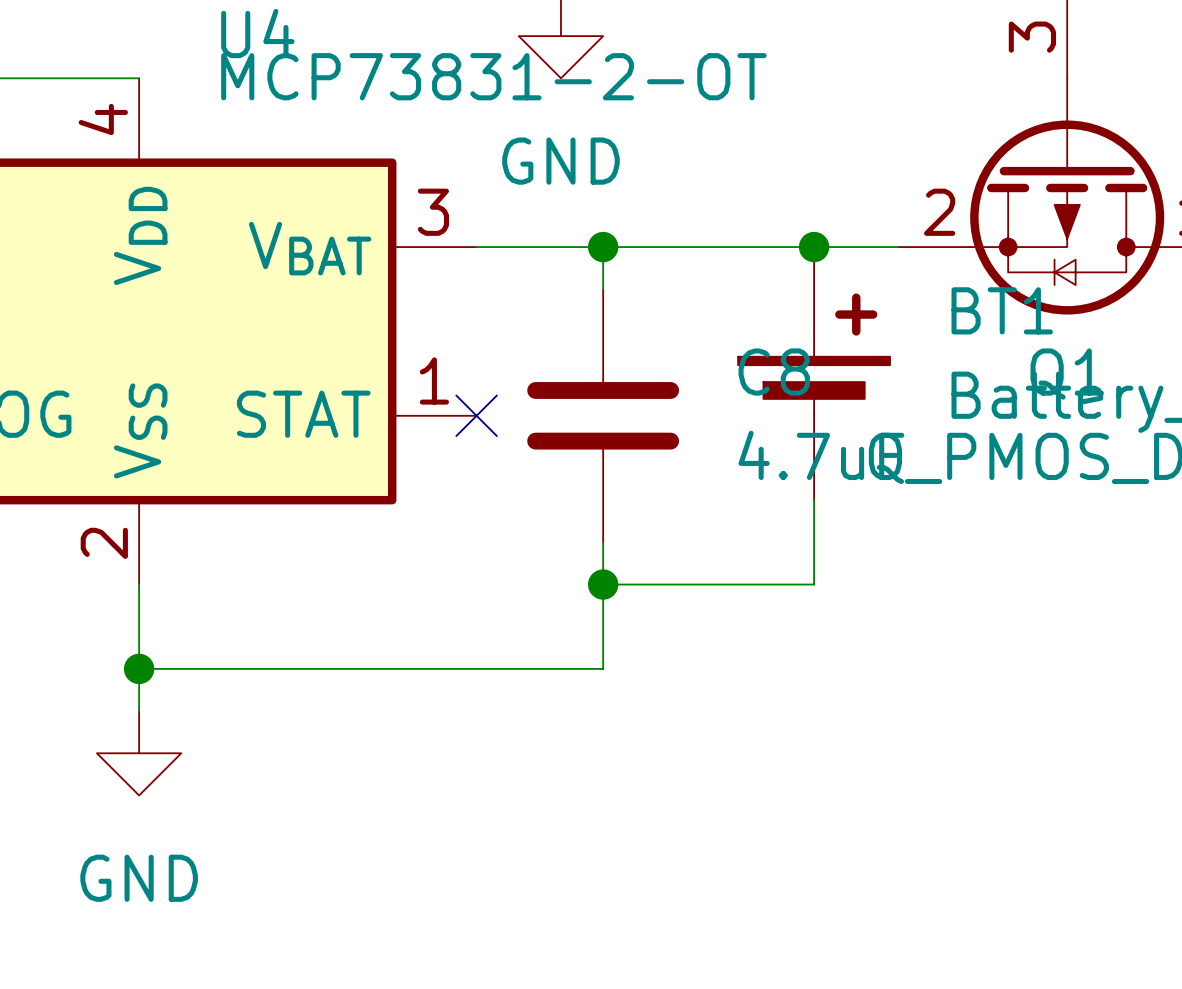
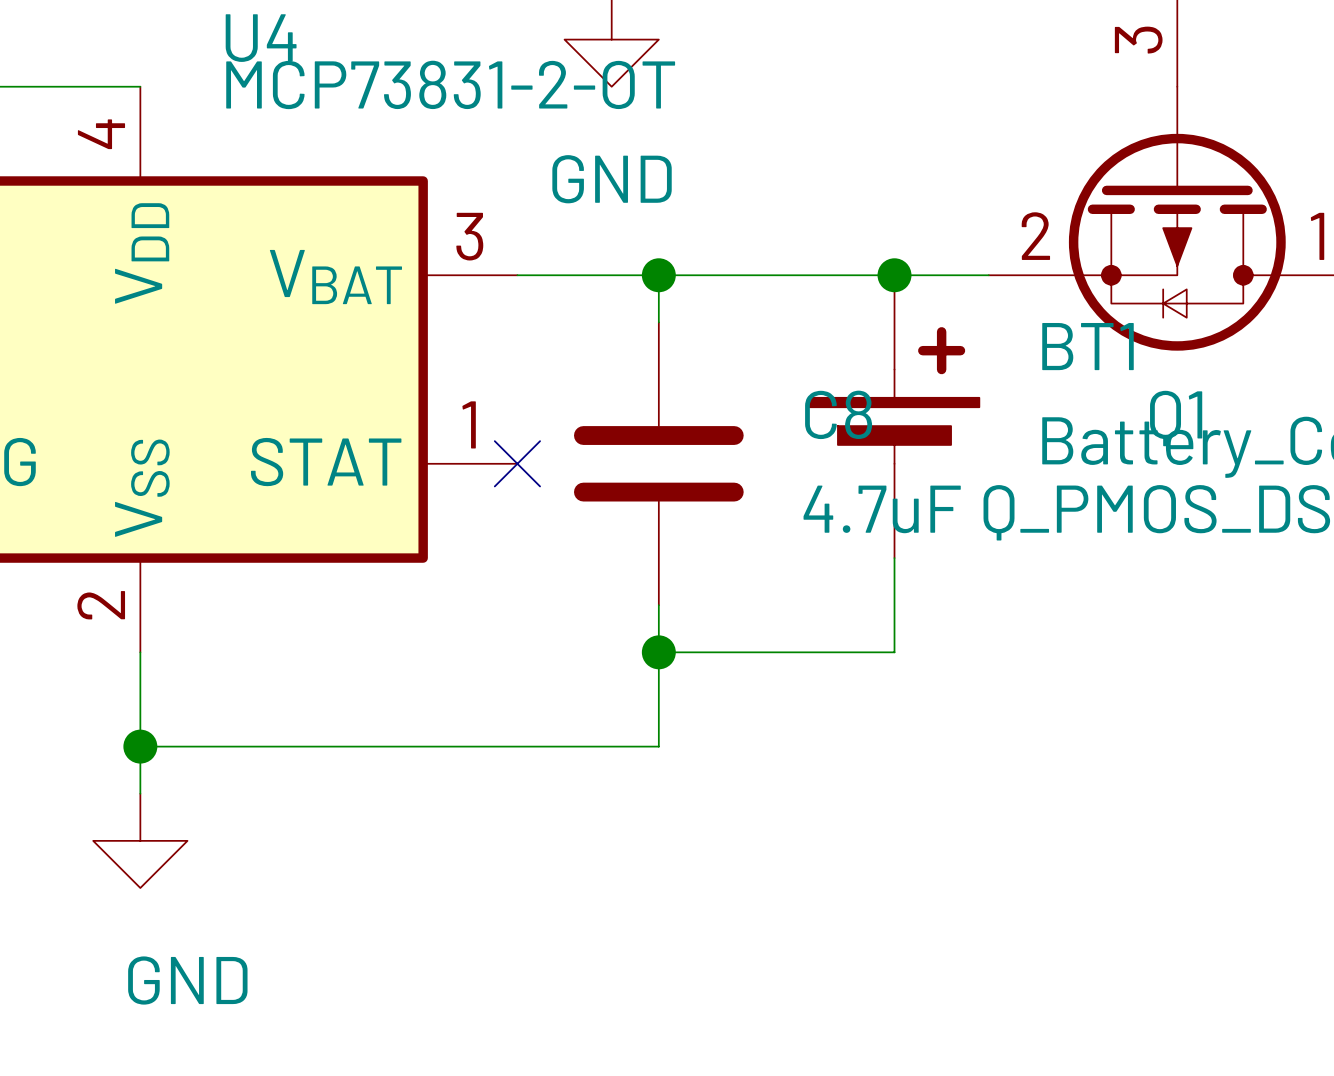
power symbol text position: GND (139, 878) -> GND (187, 980)

